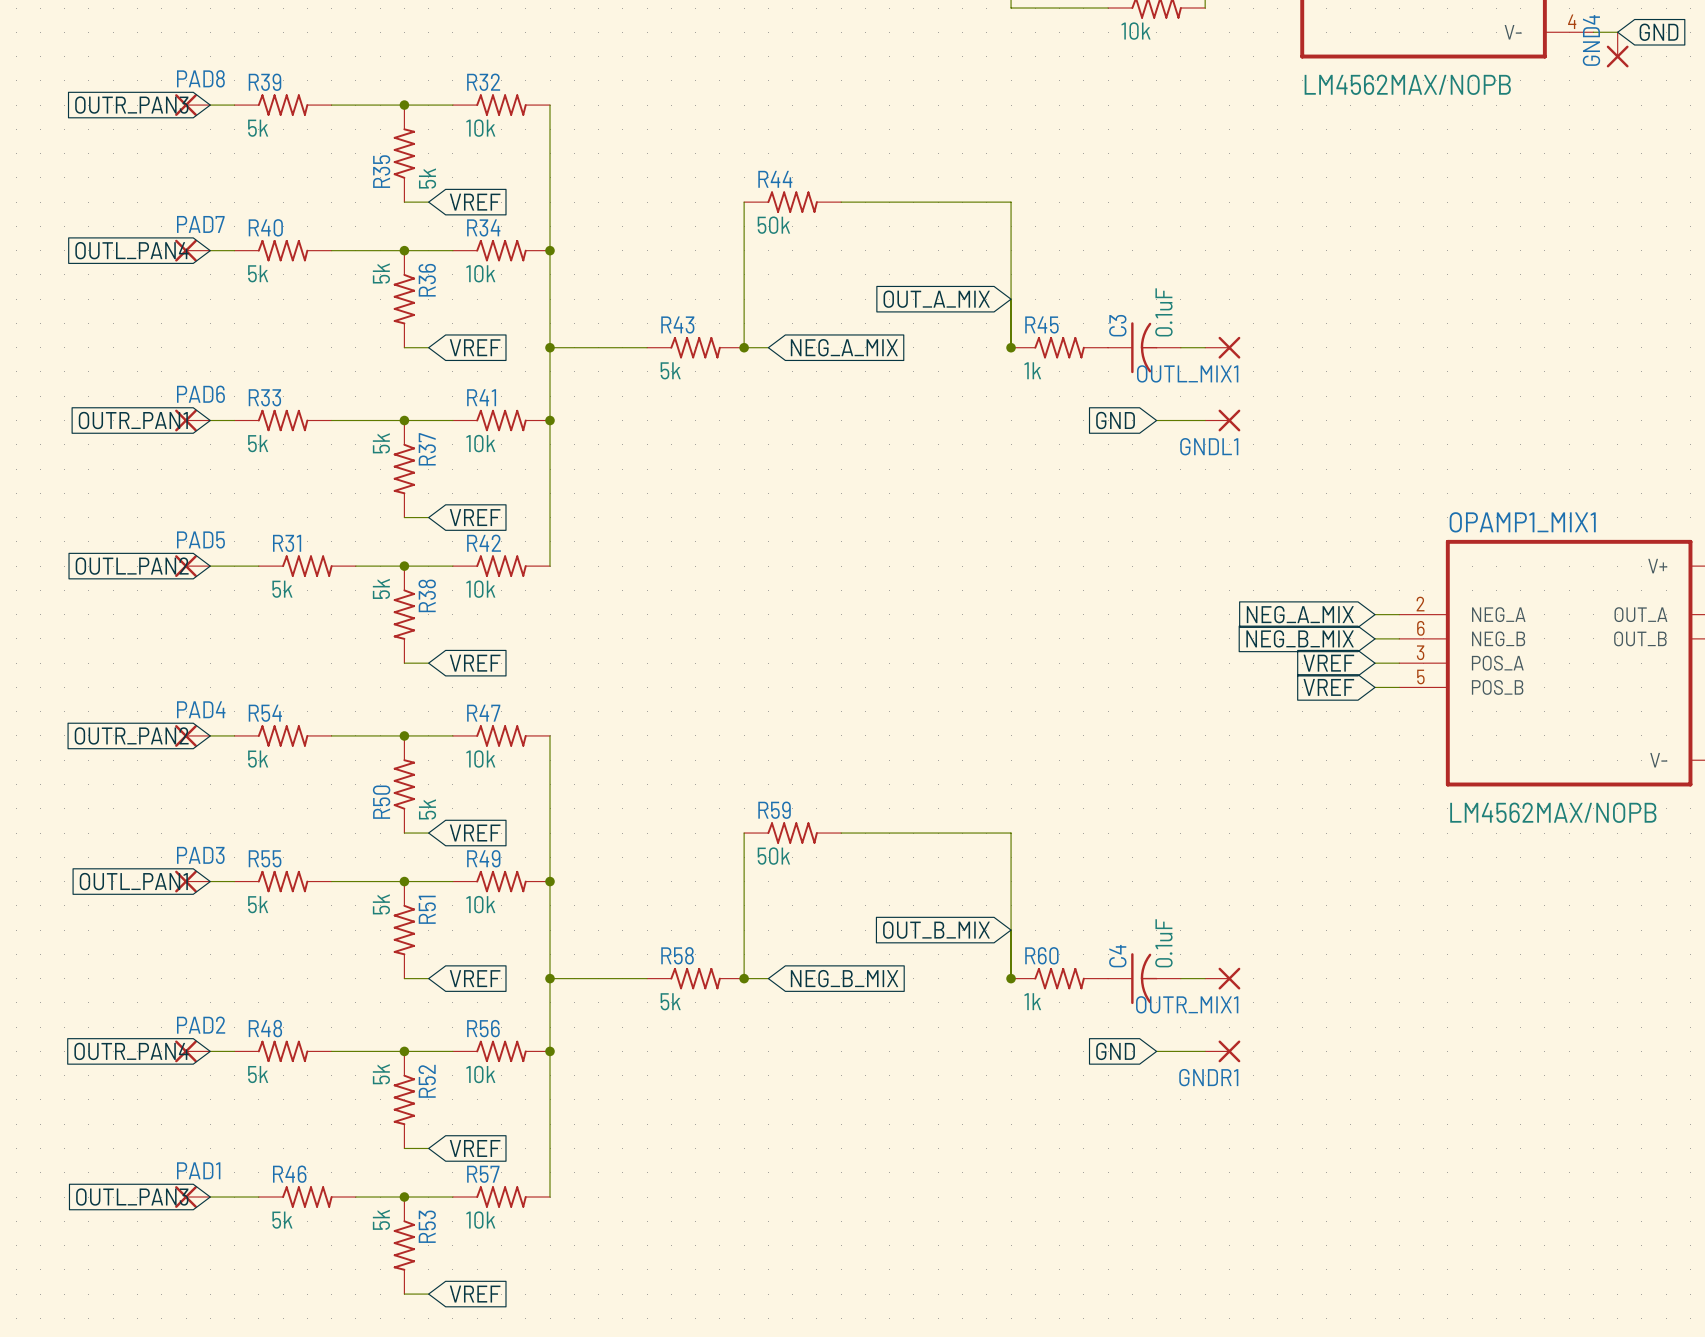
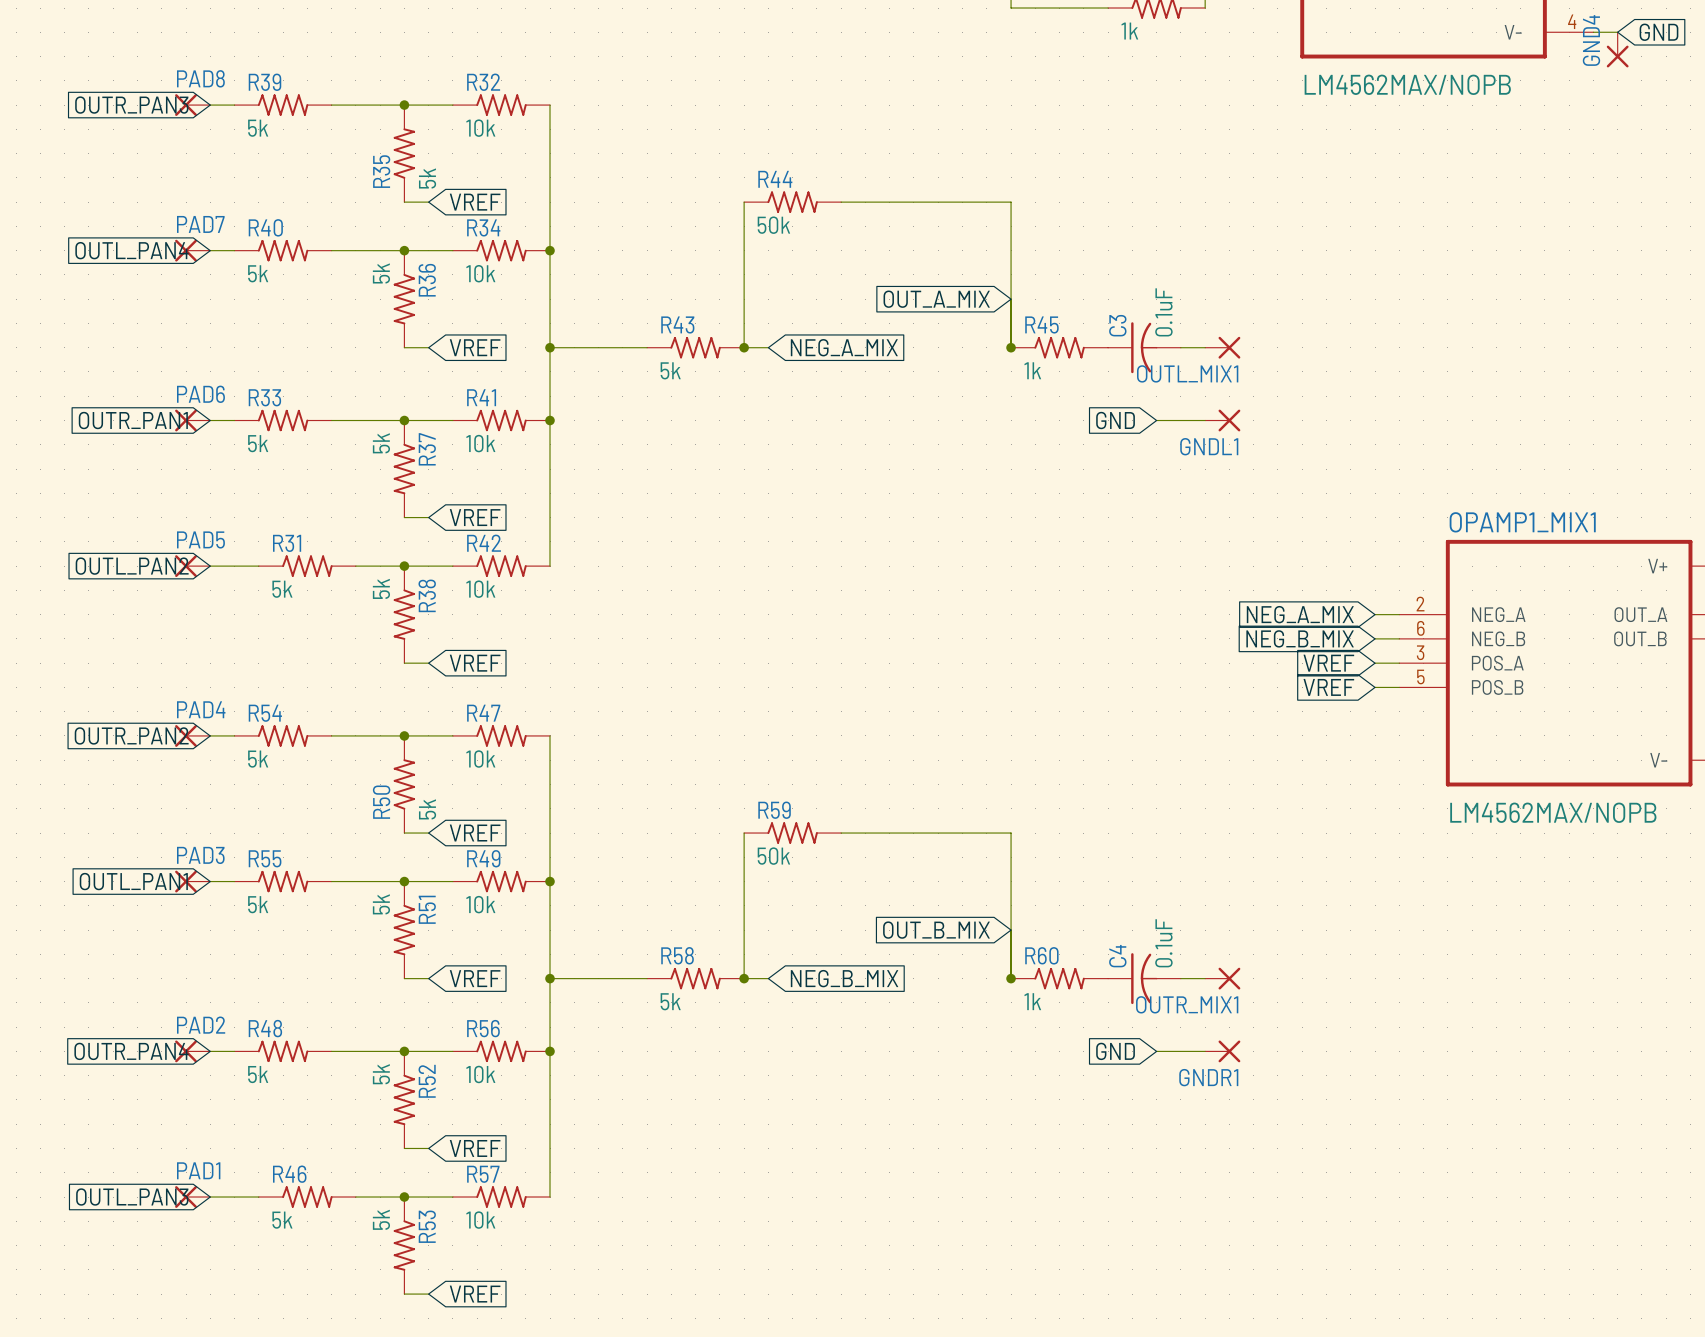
part value: 10k (1136, 31) -> 1k (1129, 31)

